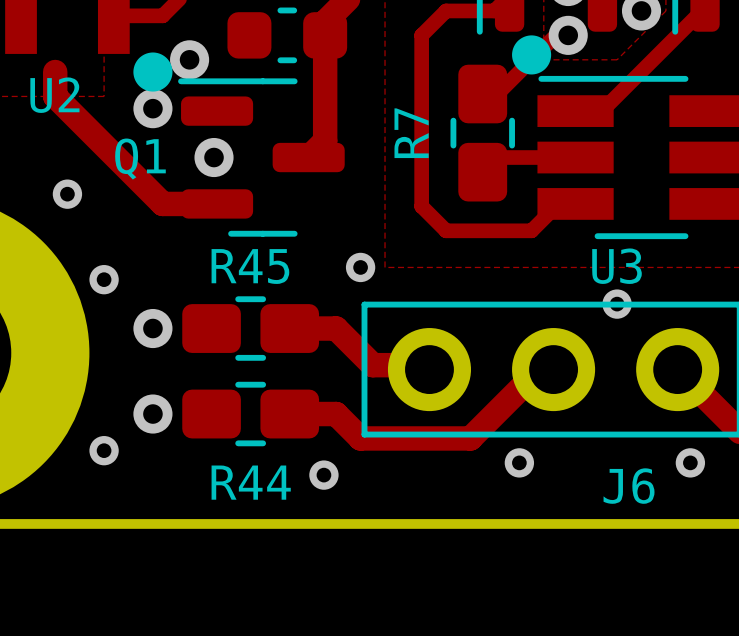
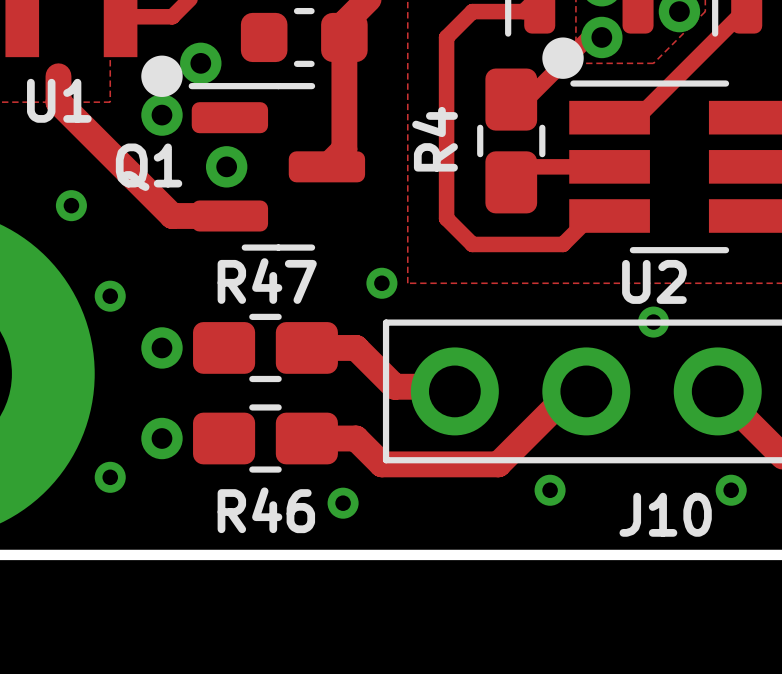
U2 name: U2 (54, 95) -> U1 (59, 100)
R7 name: R7 (411, 133) -> R4 (435, 139)
R45 name: R45 (250, 266) -> R47 (267, 281)
U3 name: U3 (617, 266) -> U2 (654, 281)
R44 name: R44 (251, 482) -> R46 (266, 510)
J6 name: J6 (629, 486) -> J10 (665, 514)

